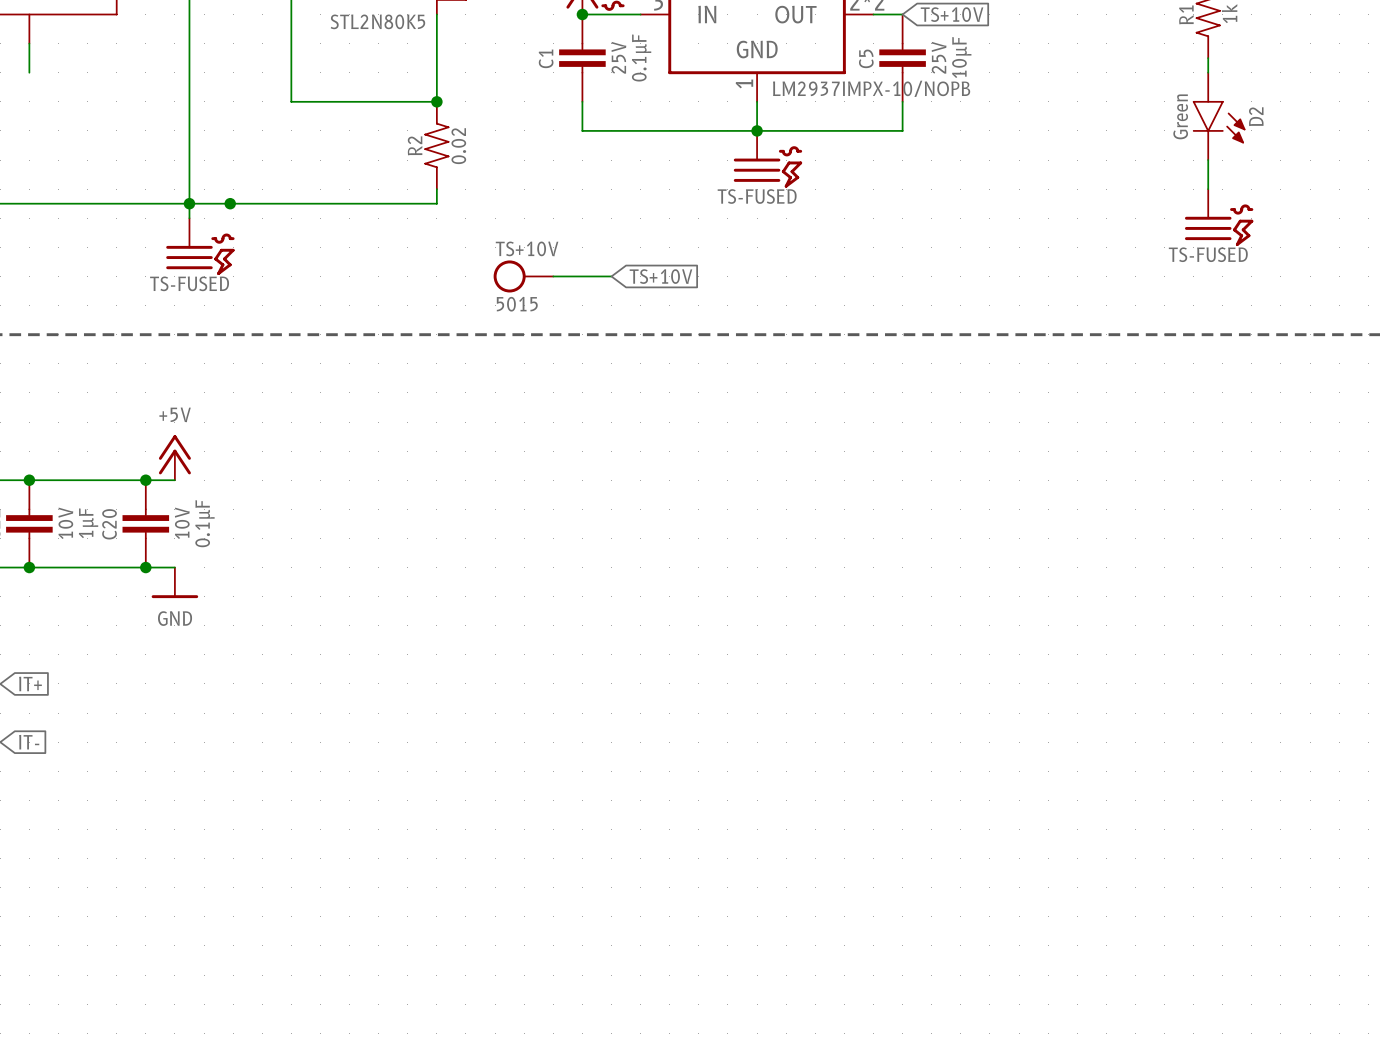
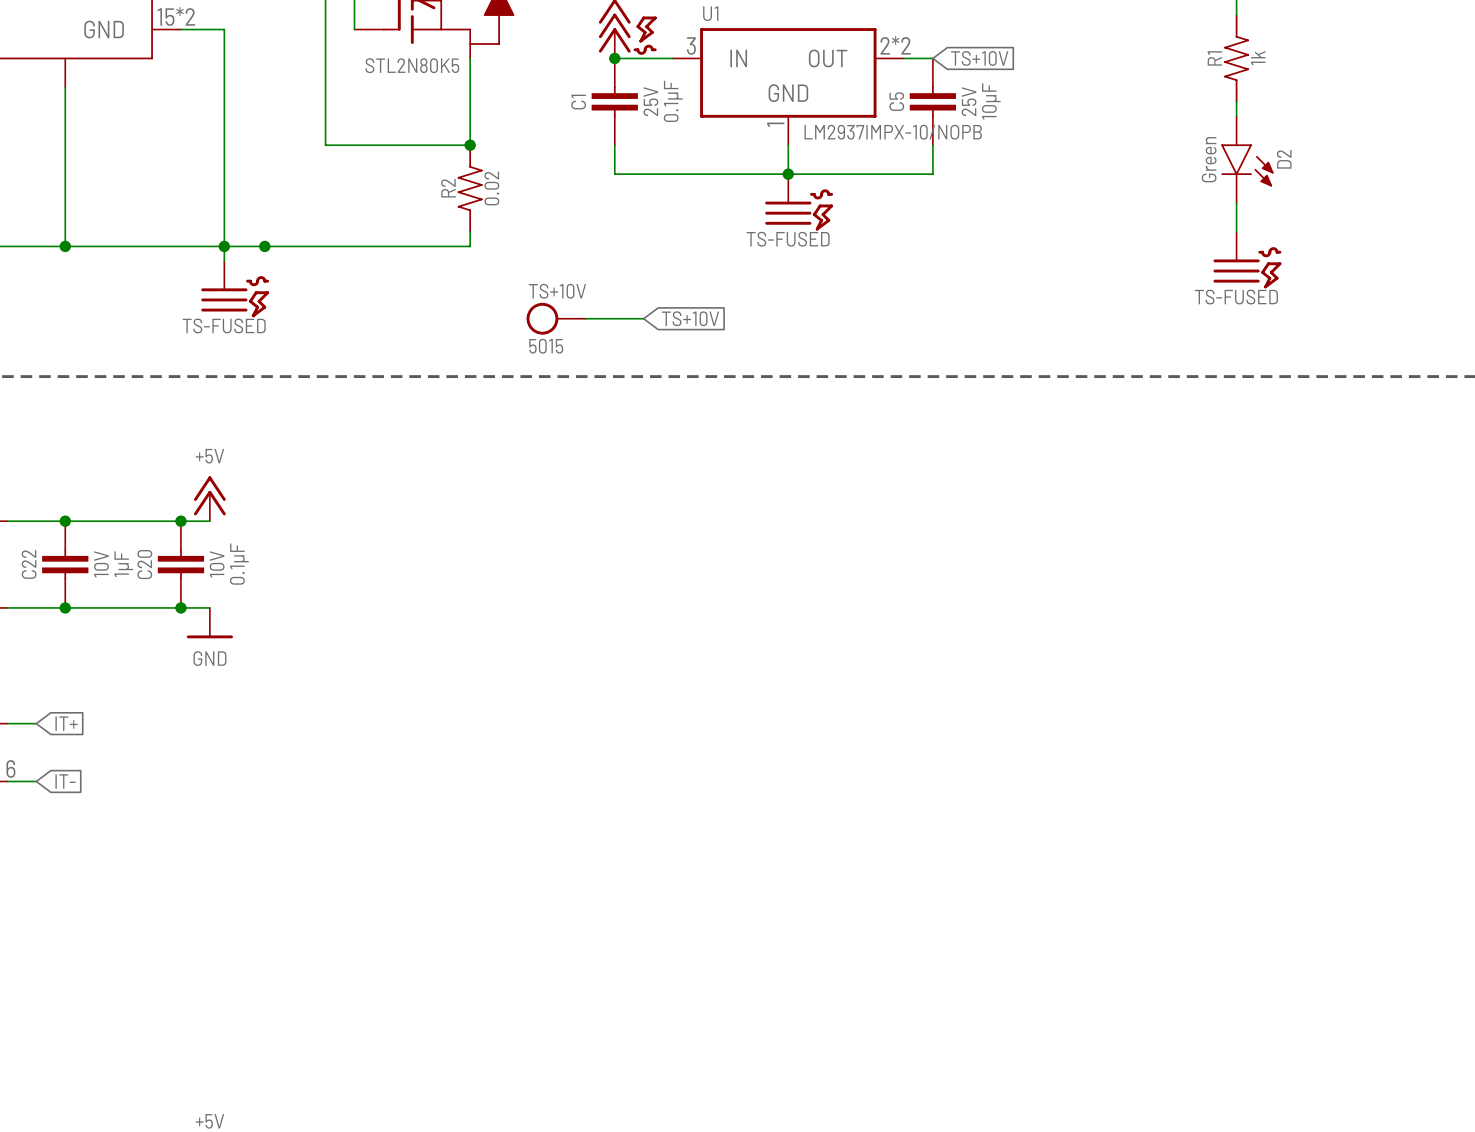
wire: none -> (65, 116) (65, 246)
junction: none -> (65, 246)

